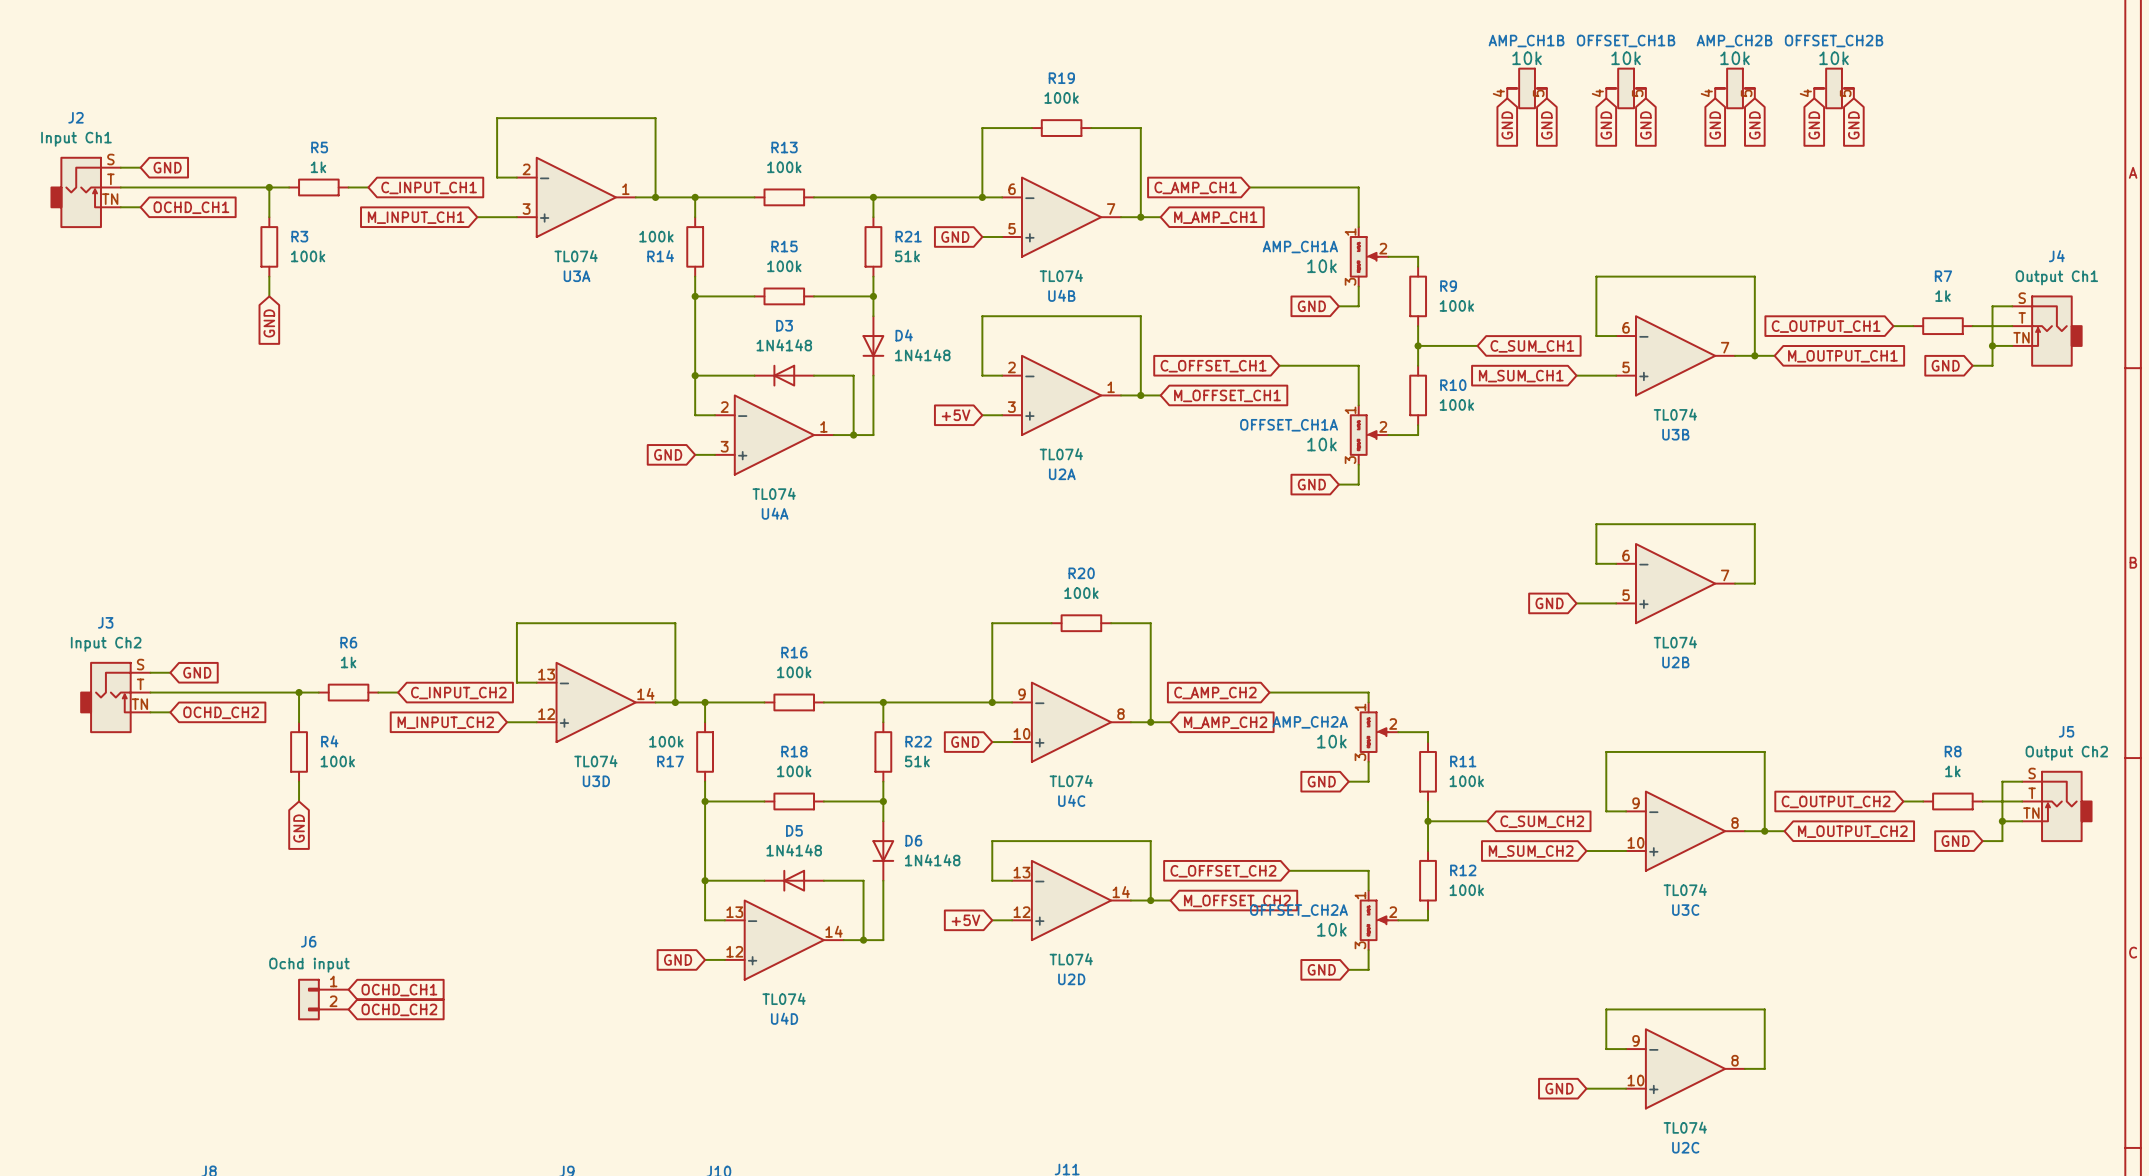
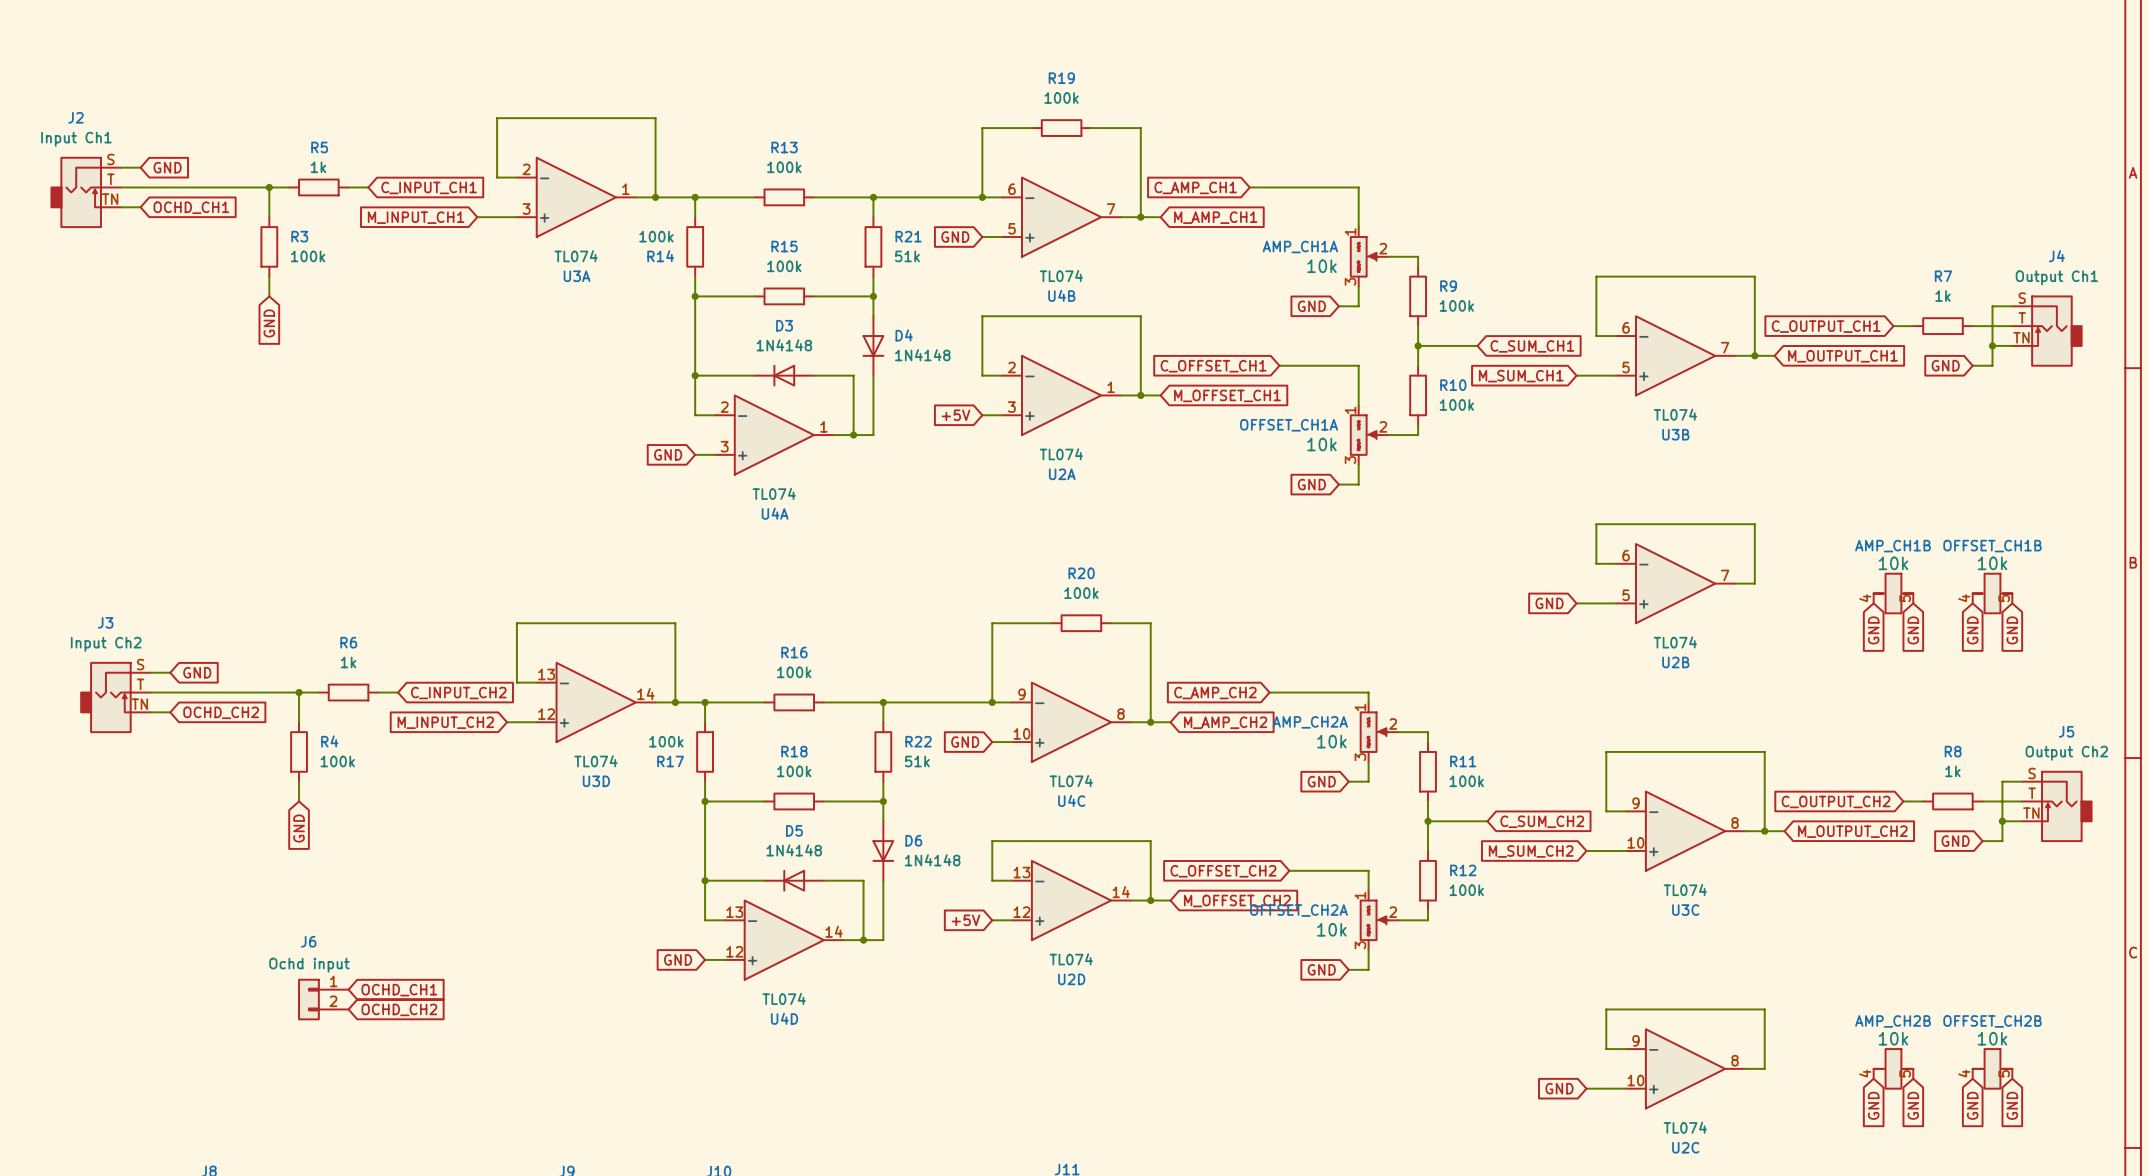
AMP_CH1B position: (1527, 88) -> (1893, 593)
OFFSET_CH1B position: (1626, 88) -> (1992, 593)
AMP_CH2B position: (1735, 88) -> (1893, 1068)
OFFSET_CH2B position: (1834, 88) -> (1992, 1068)
global label: GND (1507, 125) -> none
global label: GND (1546, 125) -> none
global label: GND (1606, 125) -> none
global label: GND (1645, 125) -> none
global label: GND (1715, 125) -> none
global label: GND (1754, 125) -> none
global label: GND (1814, 125) -> none
global label: GND (1853, 125) -> none
global label: none -> GND (1873, 630)
global label: none -> GND (1913, 630)
global label: none -> GND (1972, 630)
global label: none -> GND (2012, 630)
global label: none -> GND (1873, 1105)
global label: none -> GND (1913, 1105)
global label: none -> GND (1972, 1105)
global label: none -> GND (2012, 1105)

